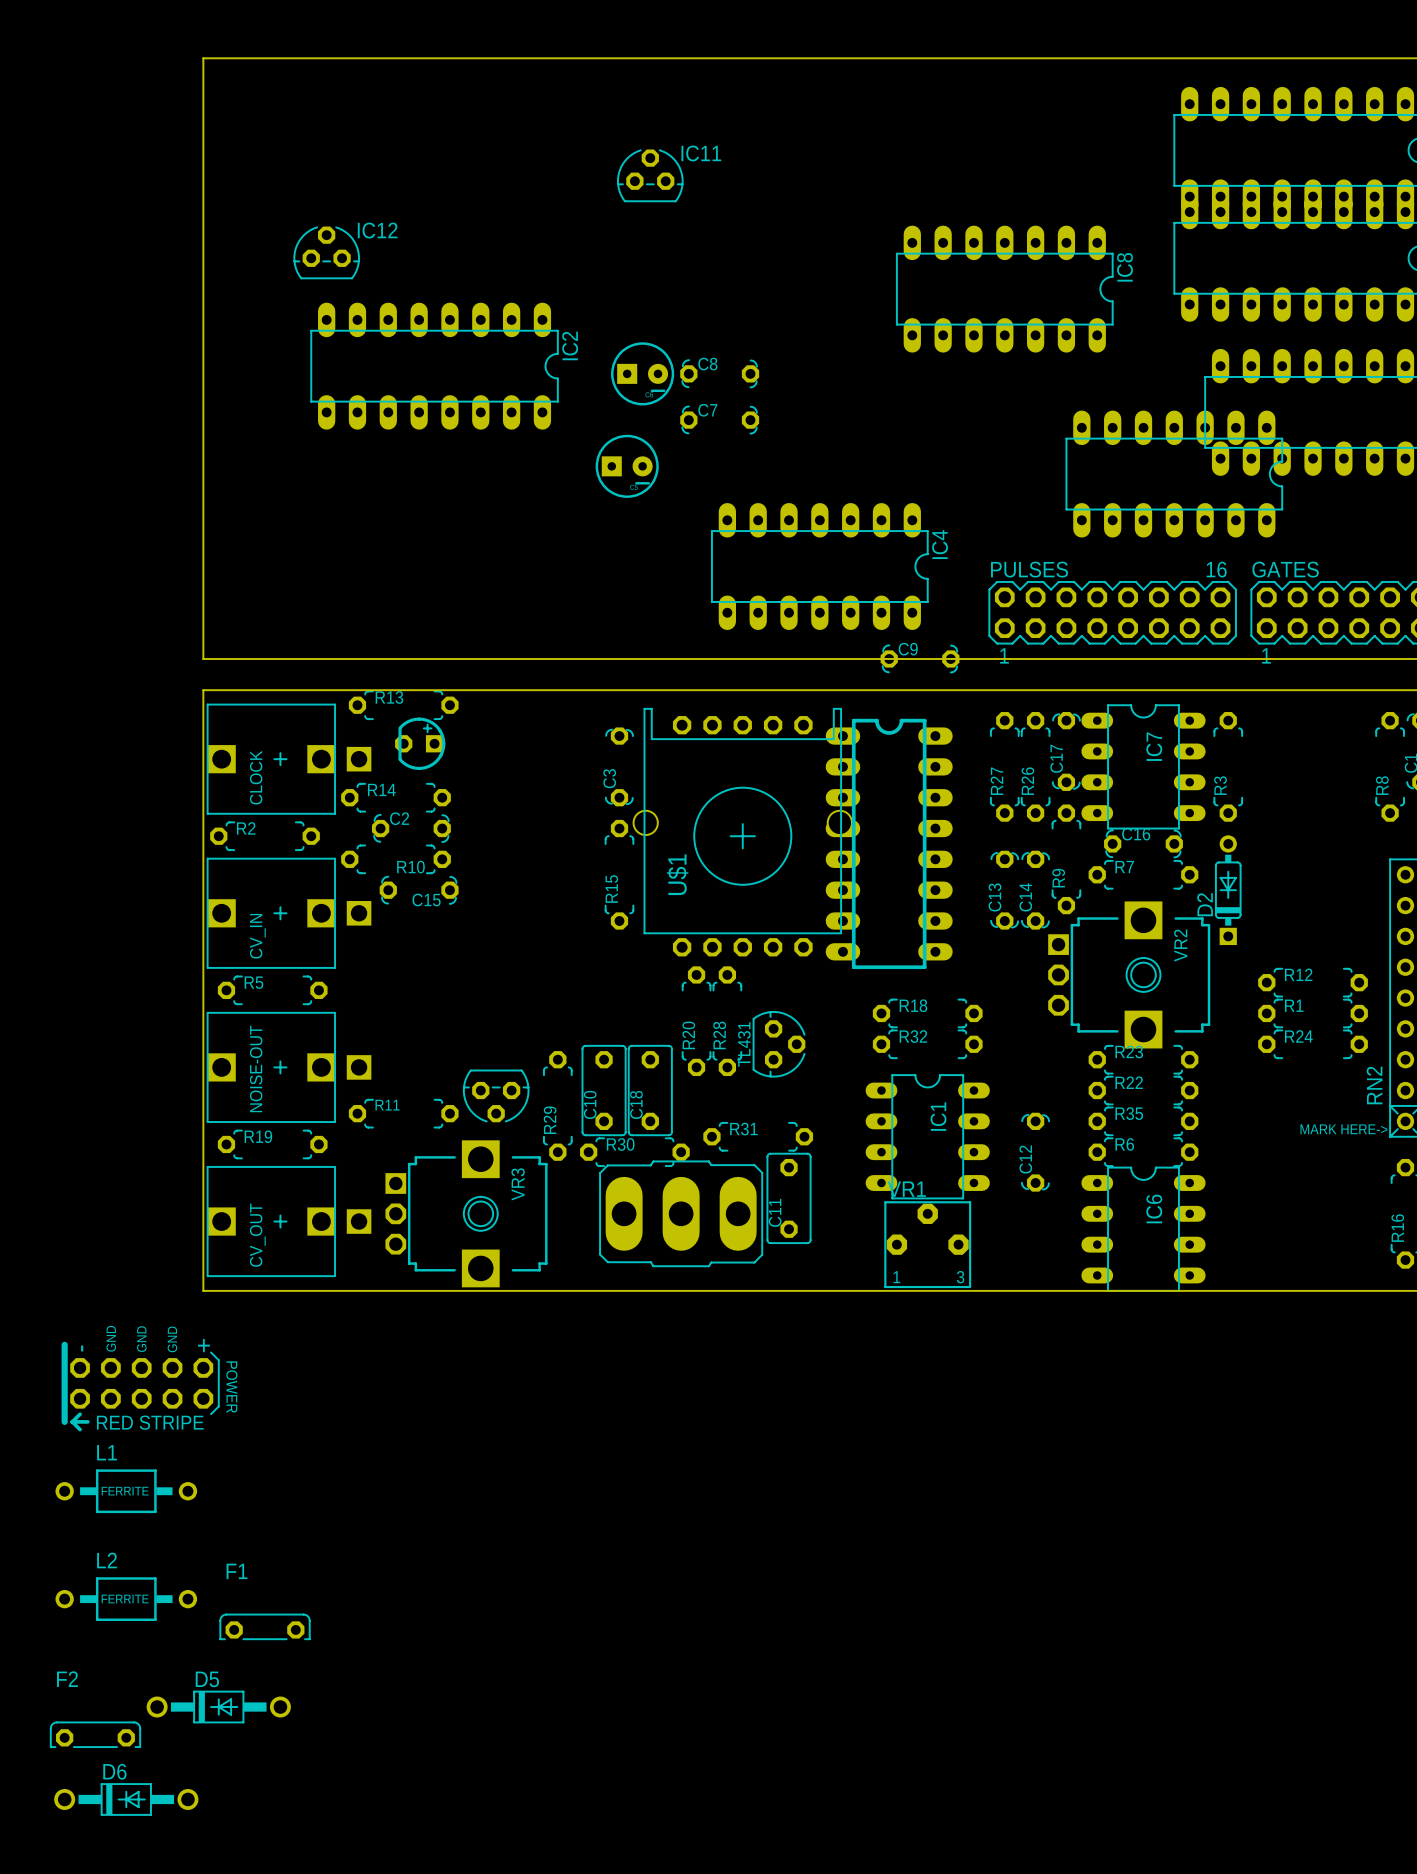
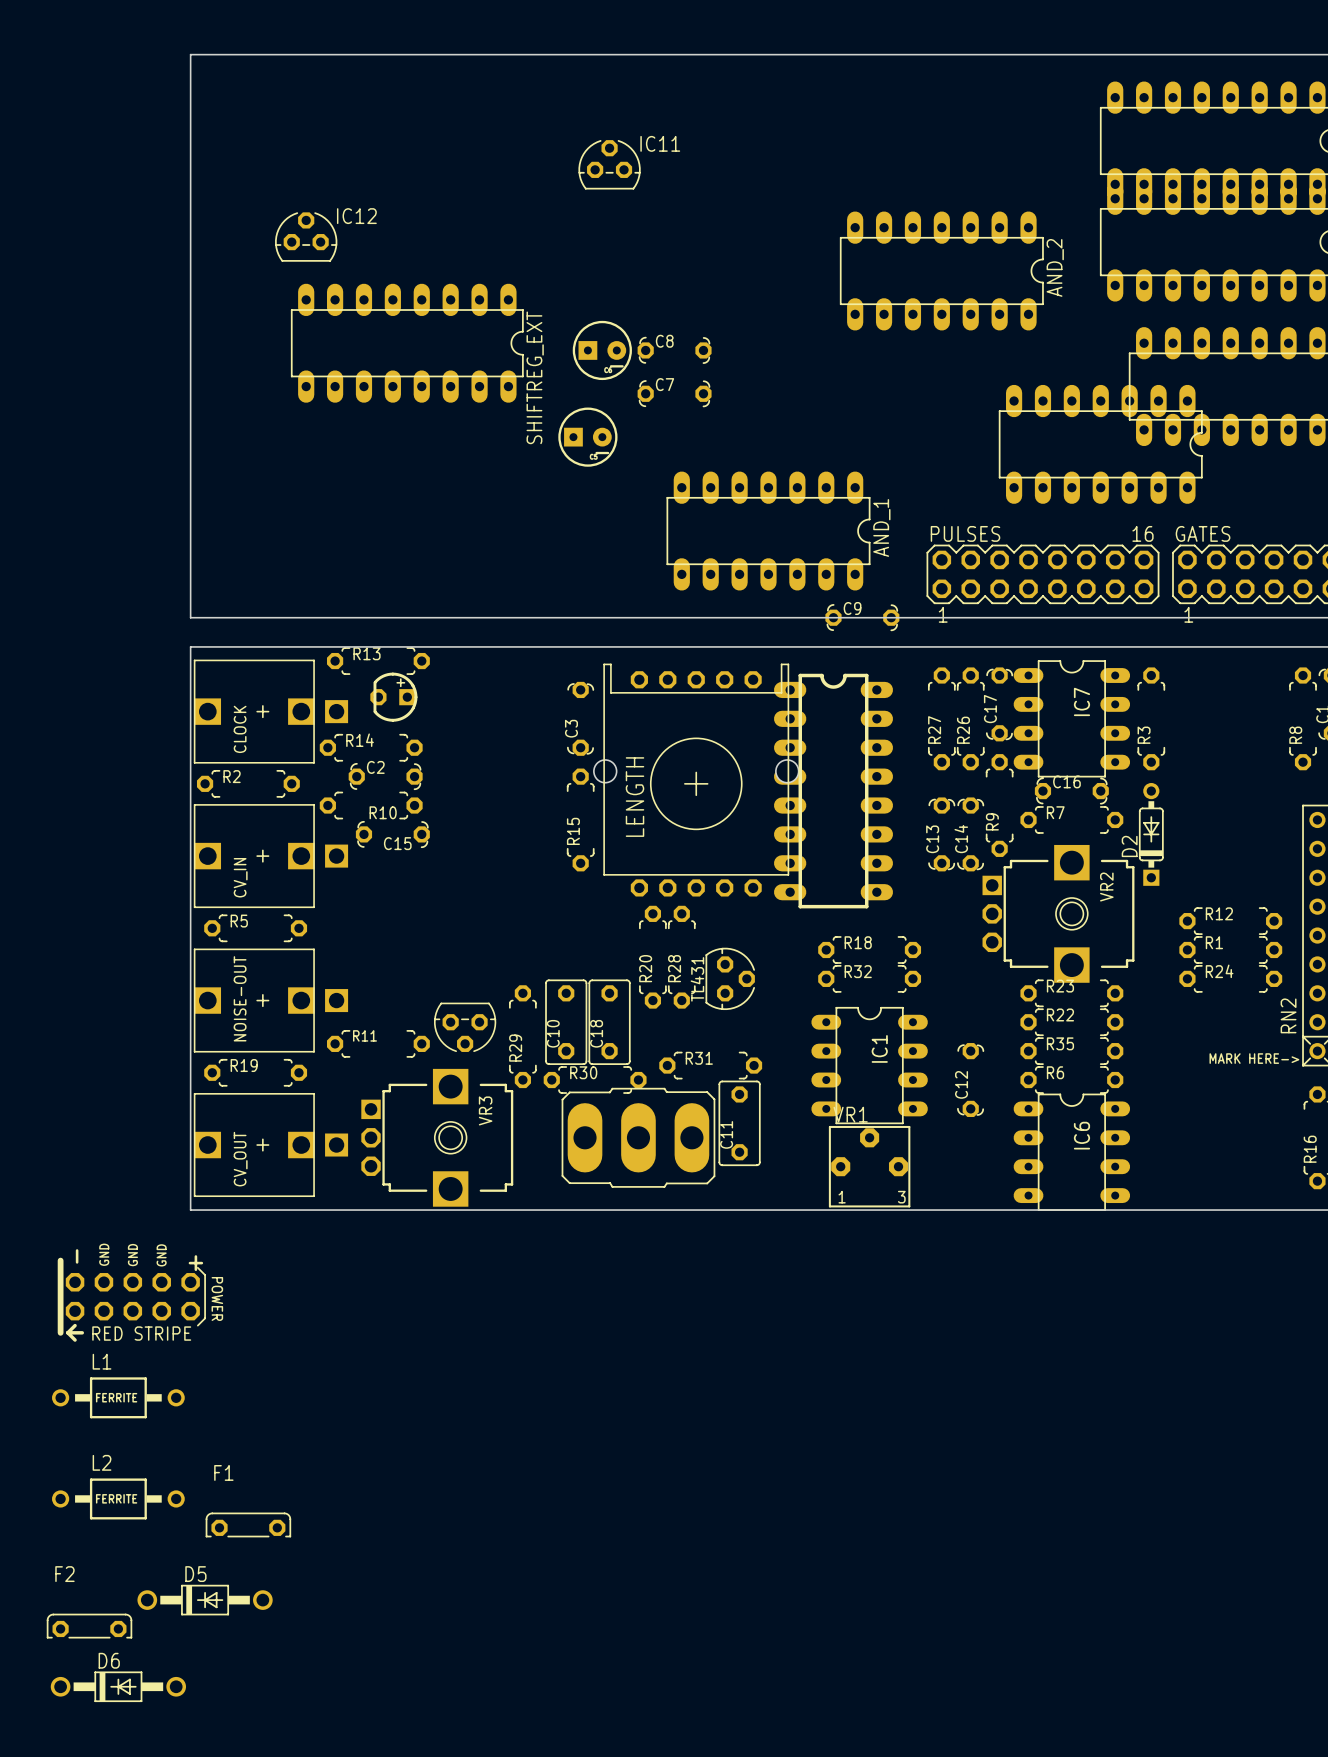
IC8 name: IC8 (1124, 267) -> AND_2 (1055, 267)
IC2 name: IC2 (570, 345) -> SHIFTREG_EXT (535, 377)
IC4 name: IC4 (940, 544) -> AND_1 (881, 527)
U$1 name: U$1 (677, 874) -> LENGTH (635, 797)

